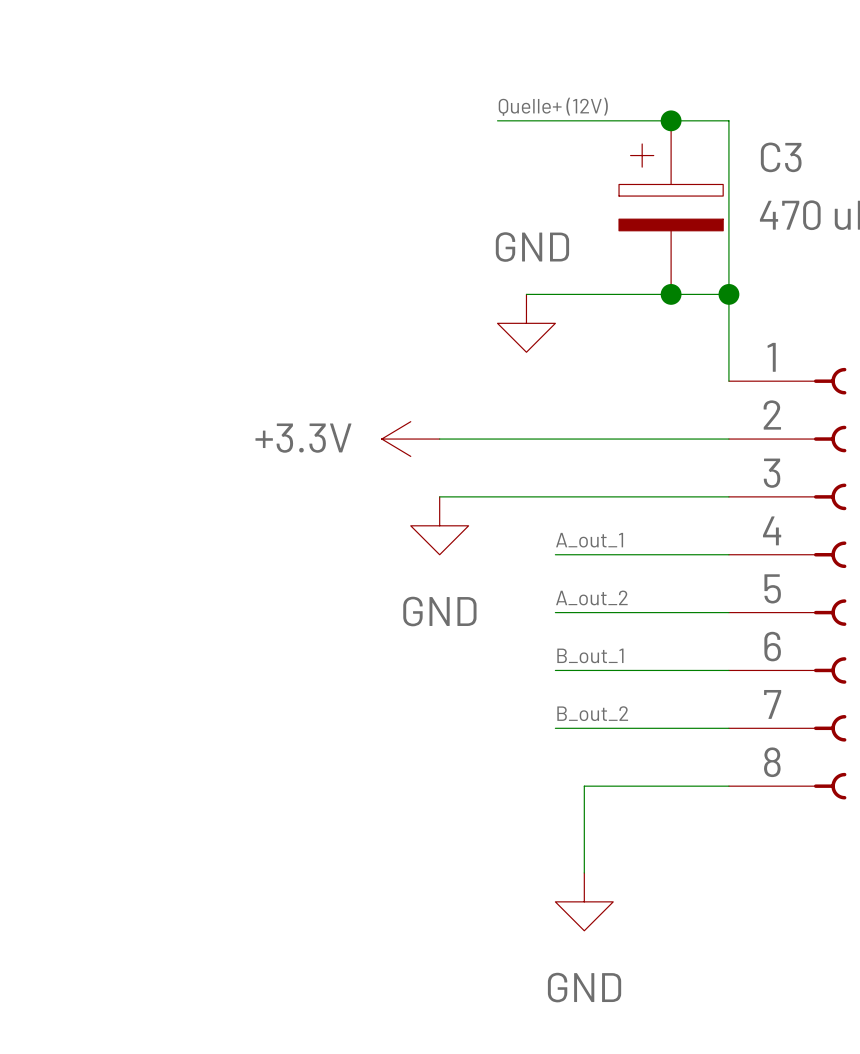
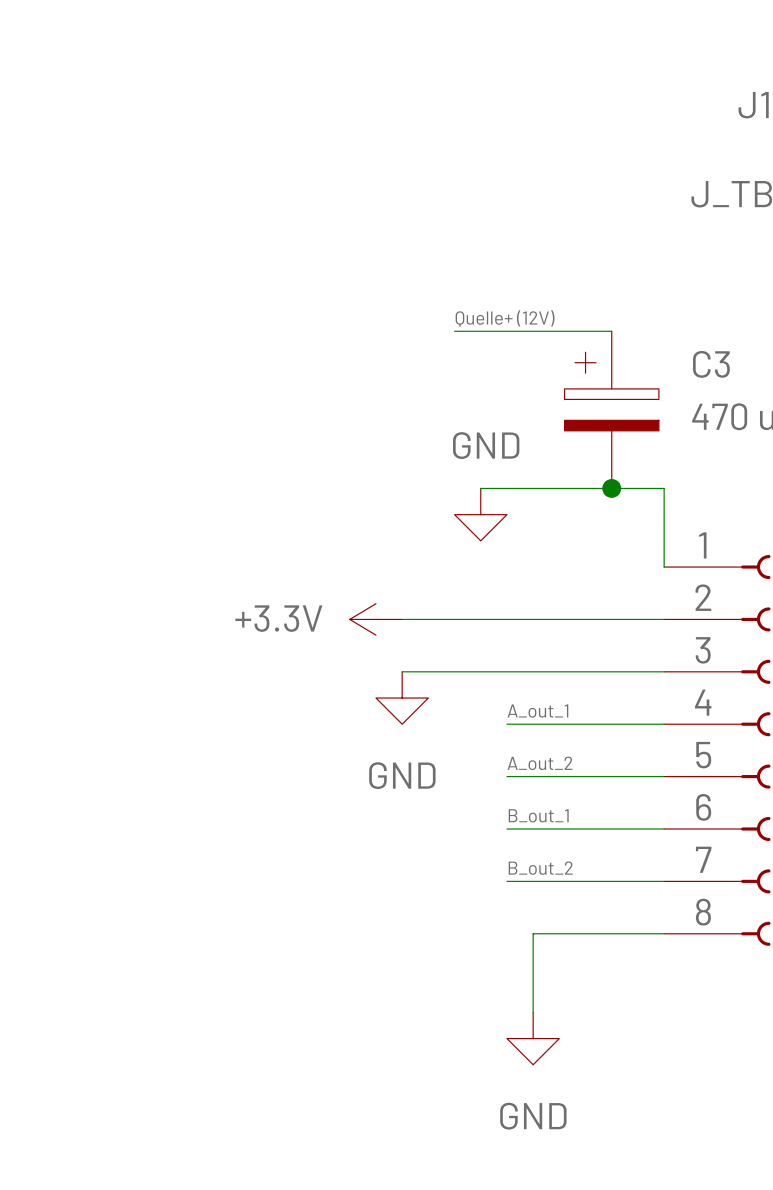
wire: (671, 120) (728, 120) (728, 294) -> none
junction: (671, 120) -> none
junction: (728, 294) -> none

